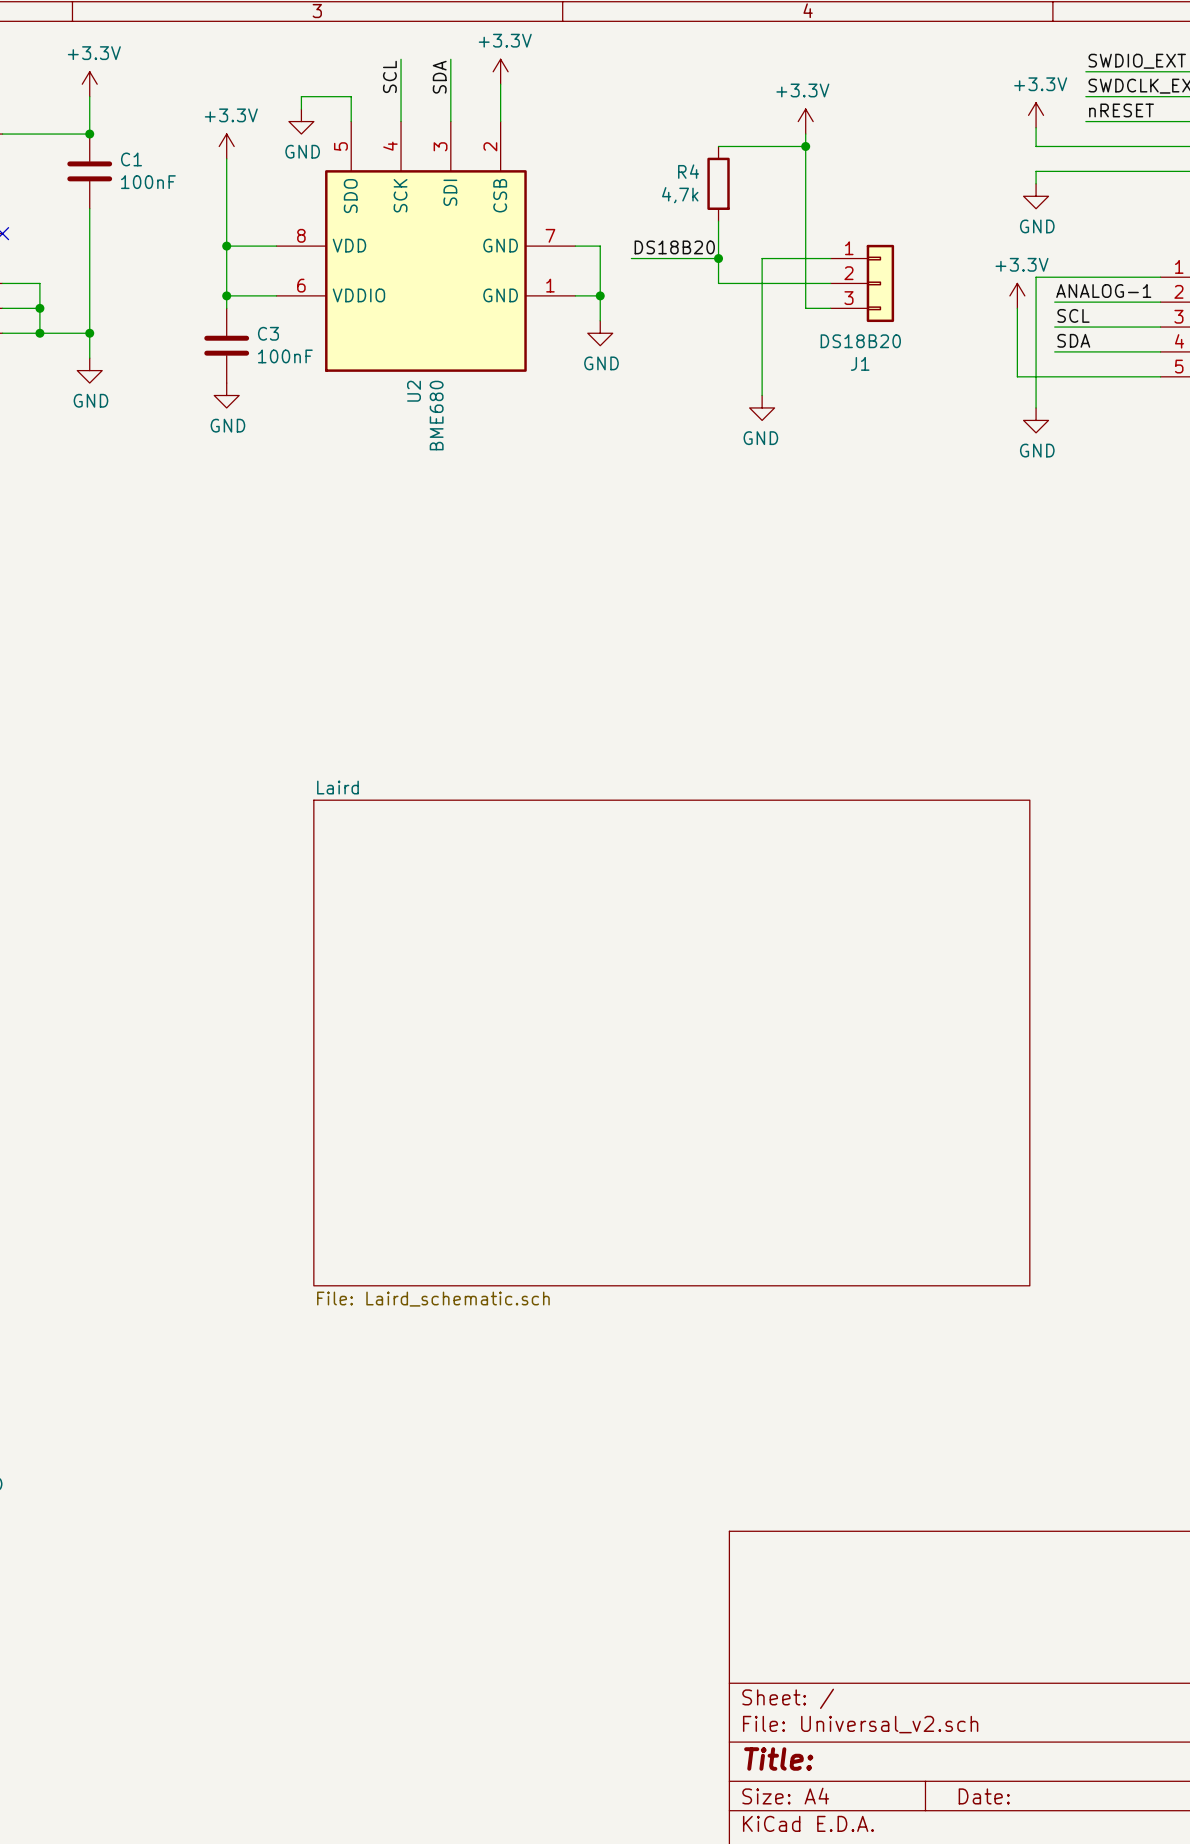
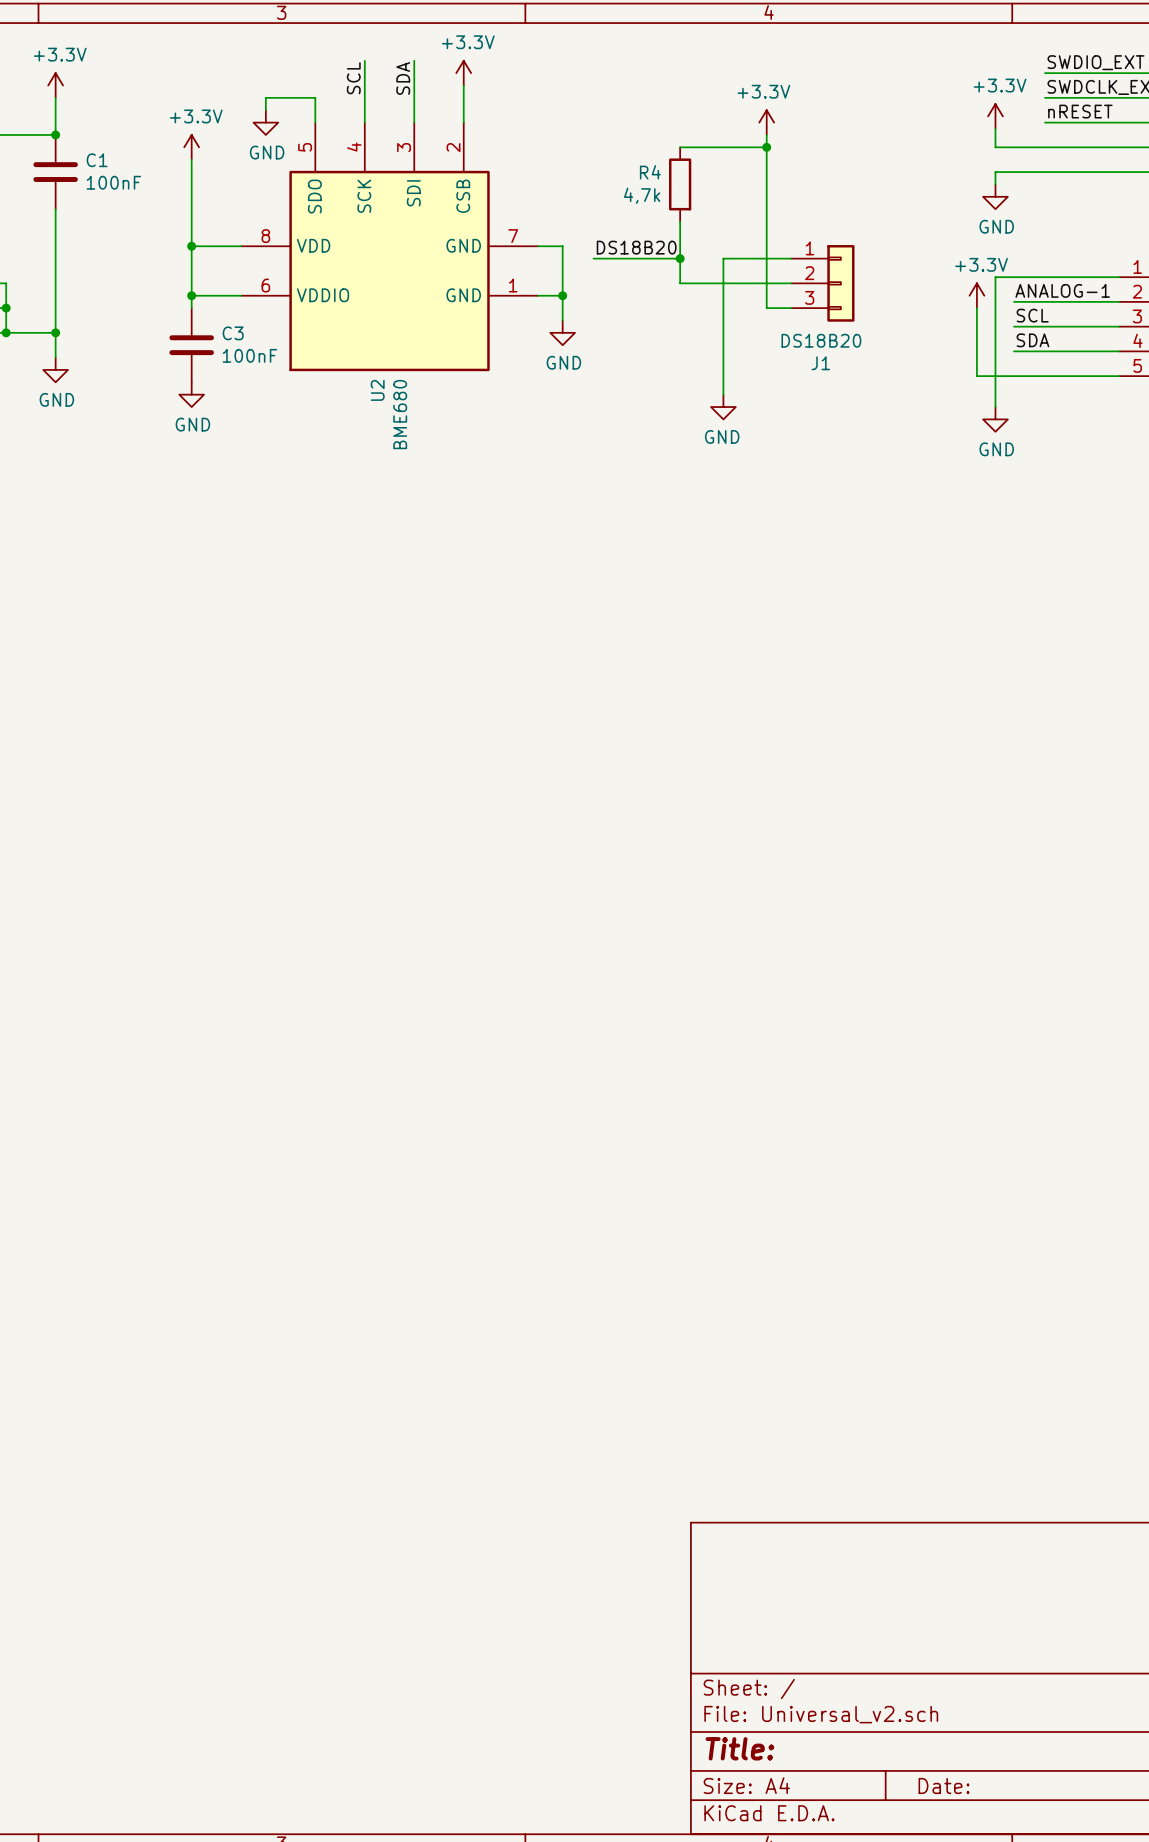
sheet Laird: File: Laird_schematic.sch (671, 1042) -> none

